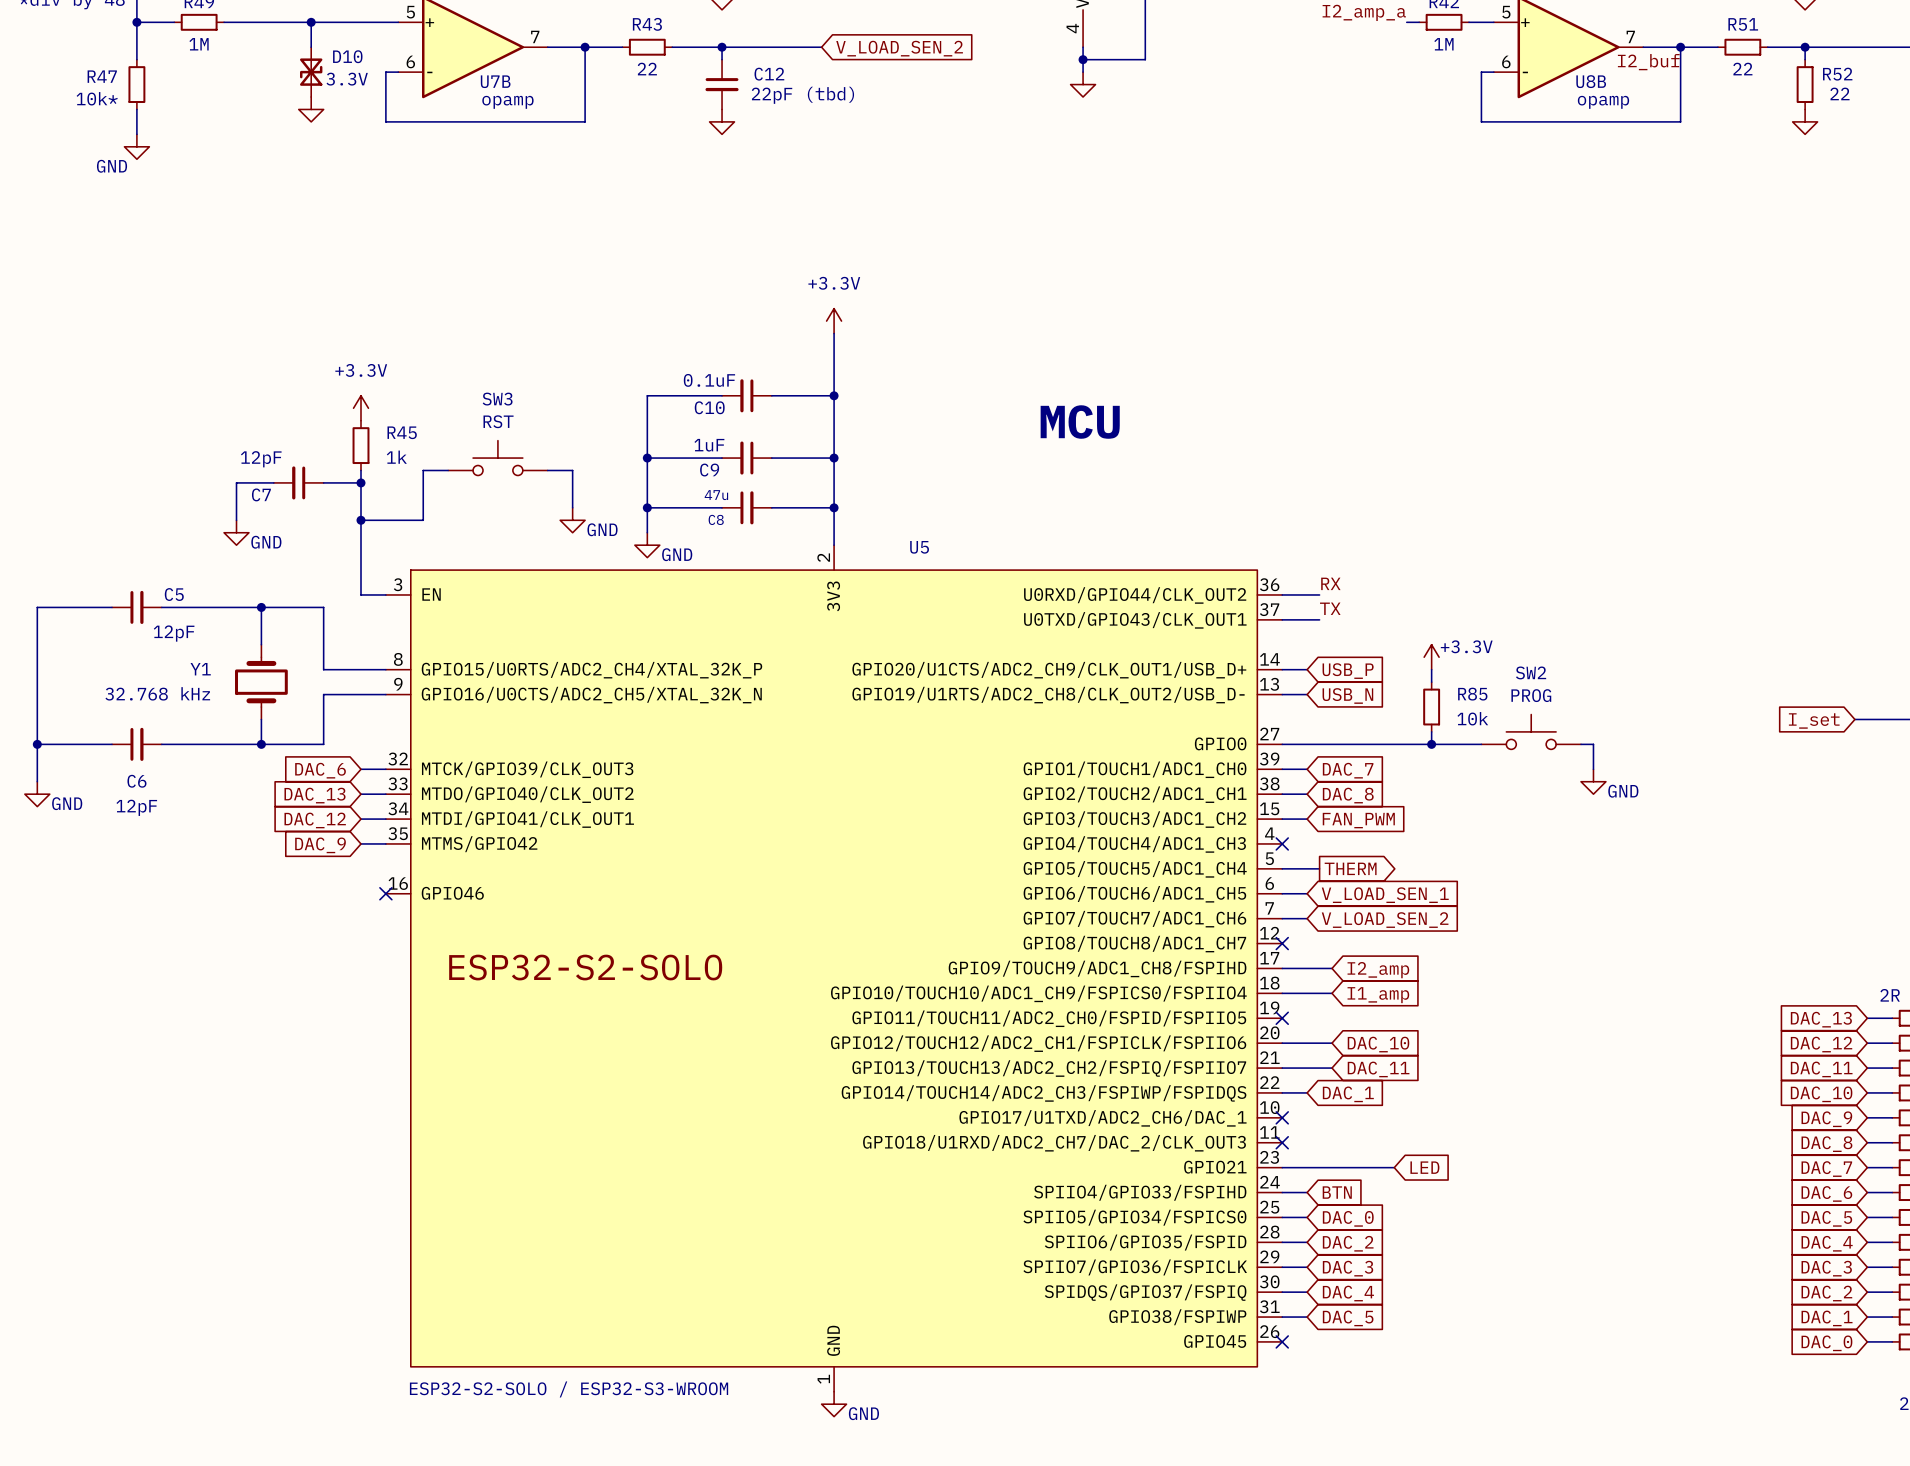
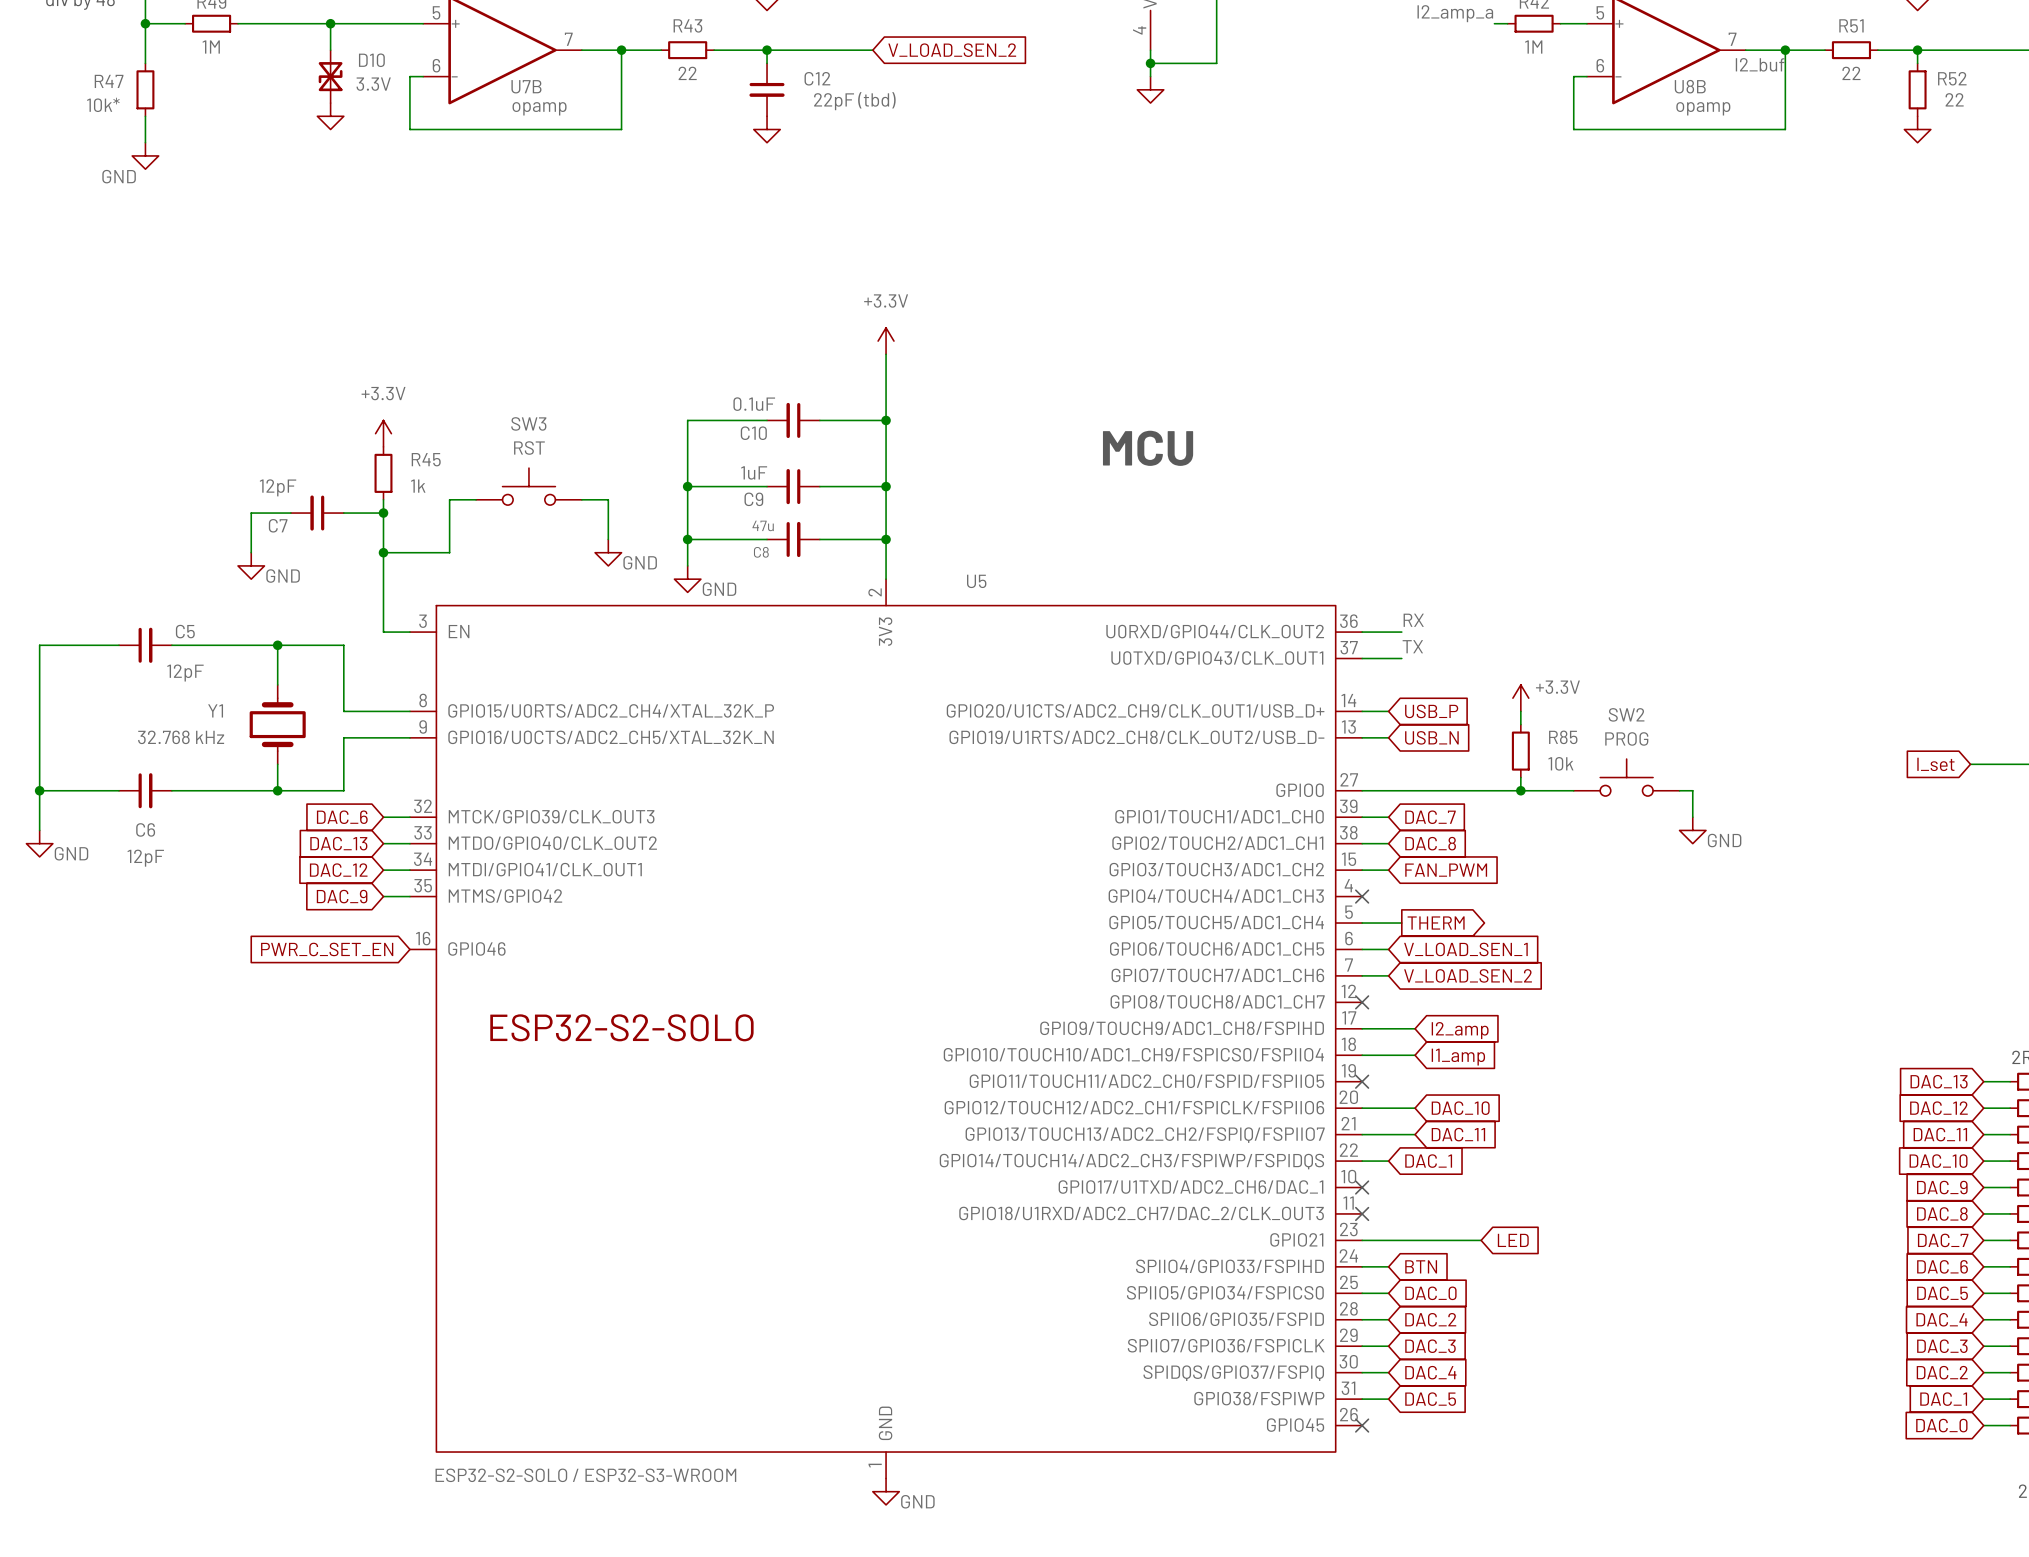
no-connect mark: (385, 893) -> none
global label: none -> PWR_C_SET_EN (327, 949)

